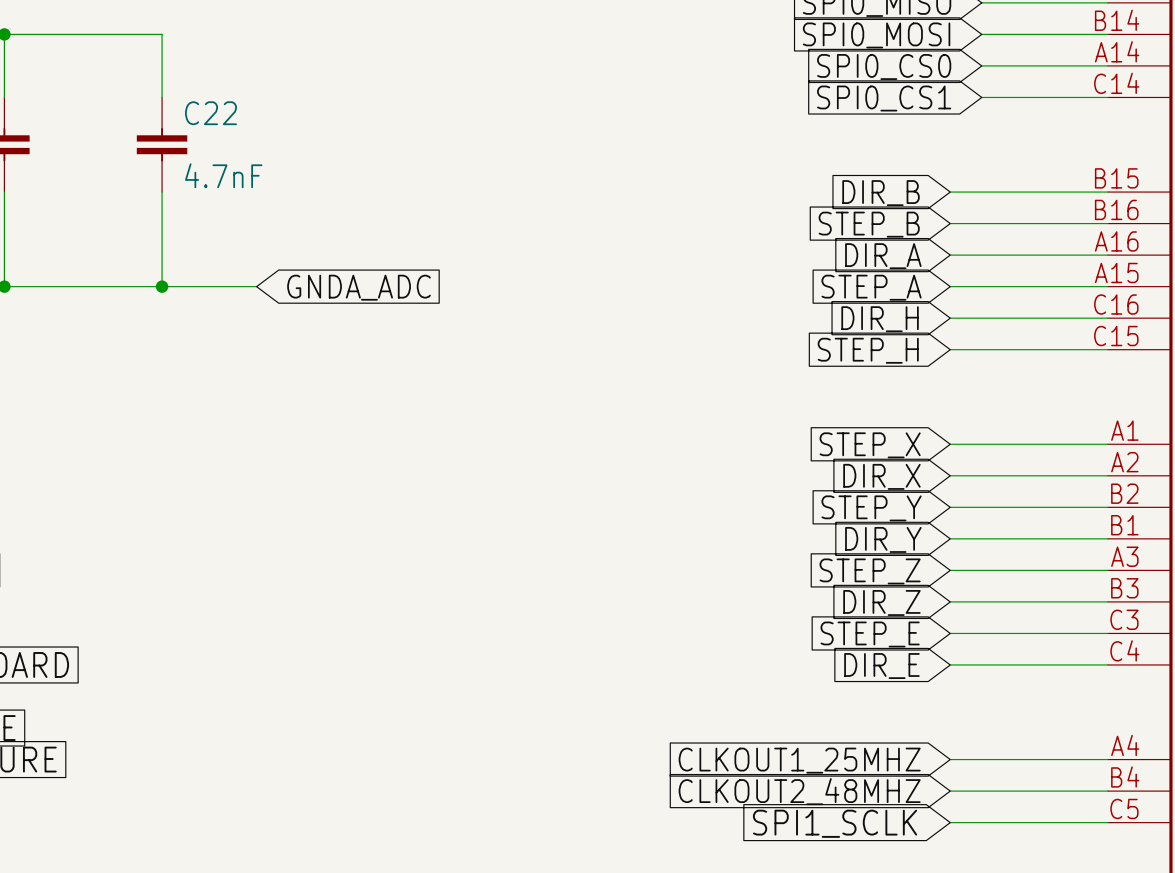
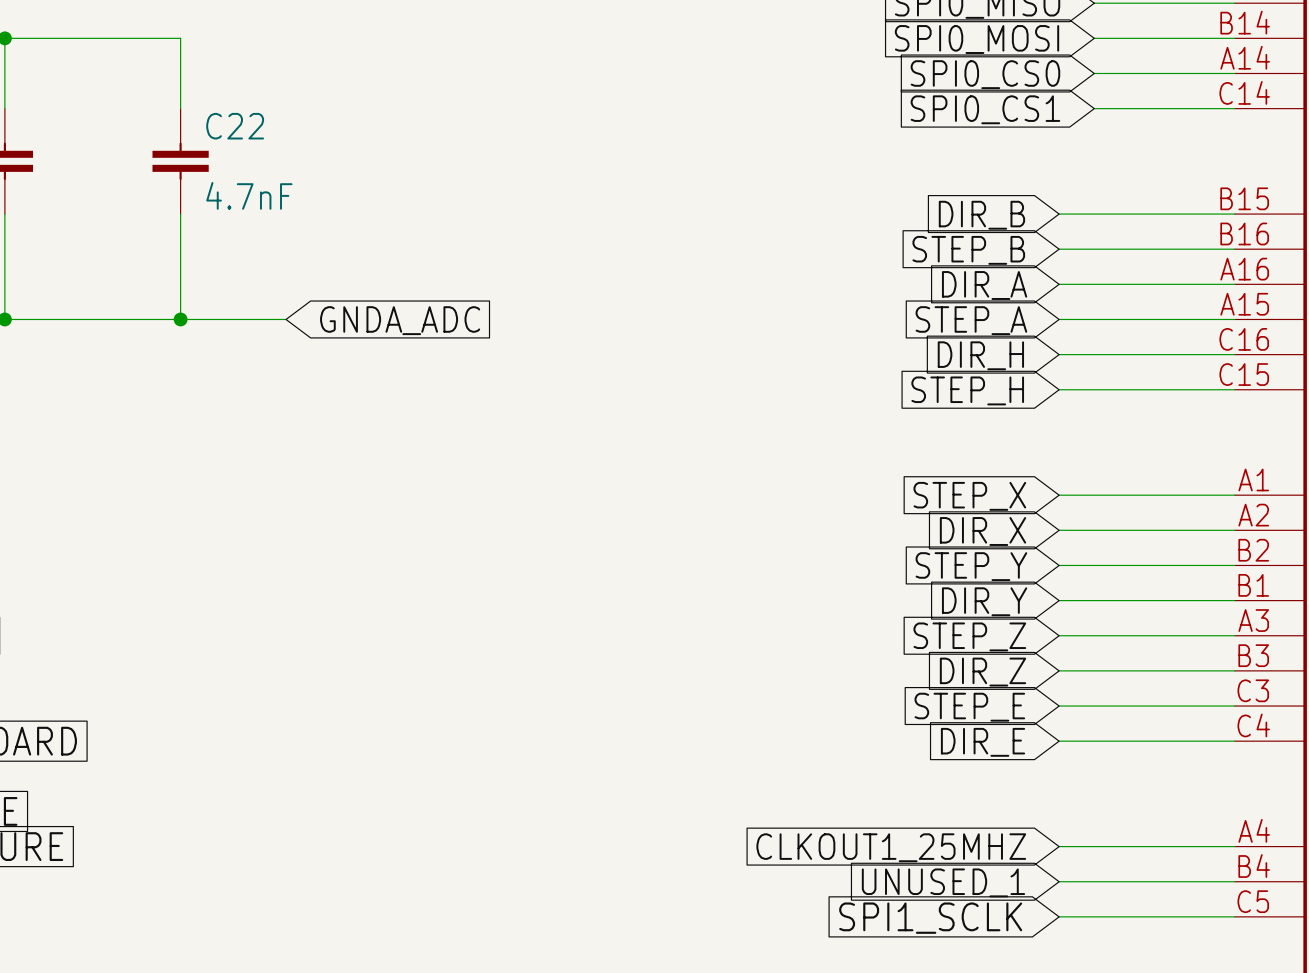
global label: CLKOUT2_48MHZ (799, 791) -> UNUSED_1 (943, 882)

